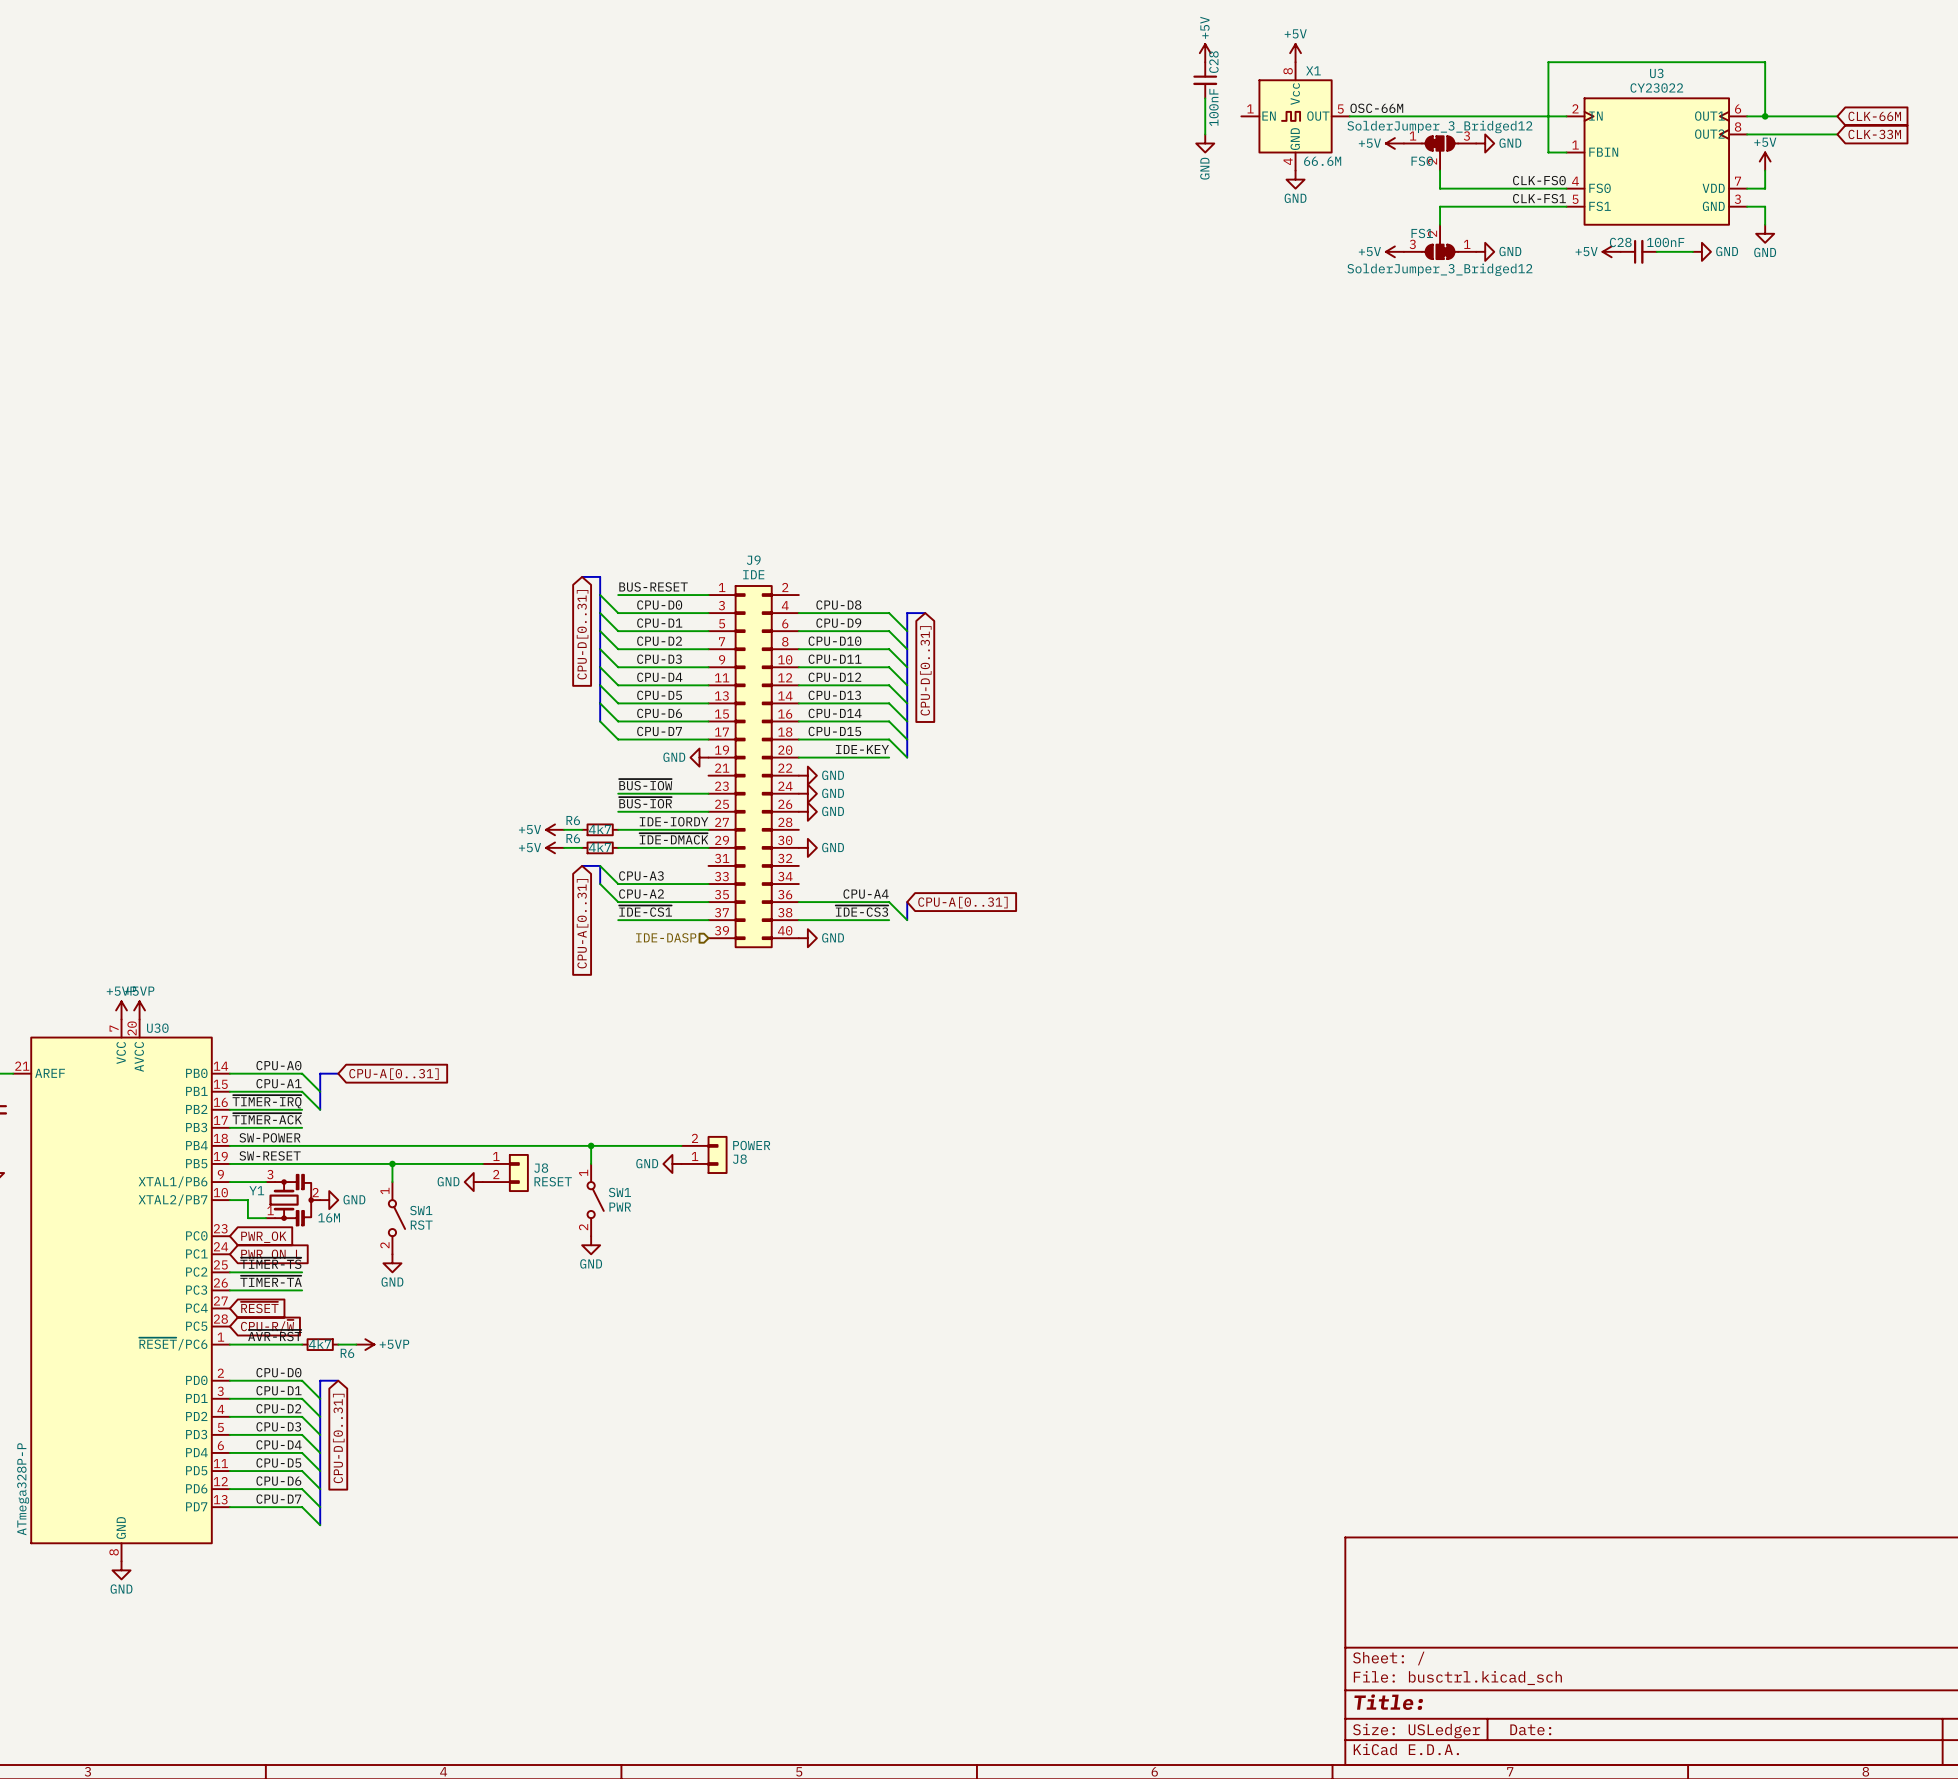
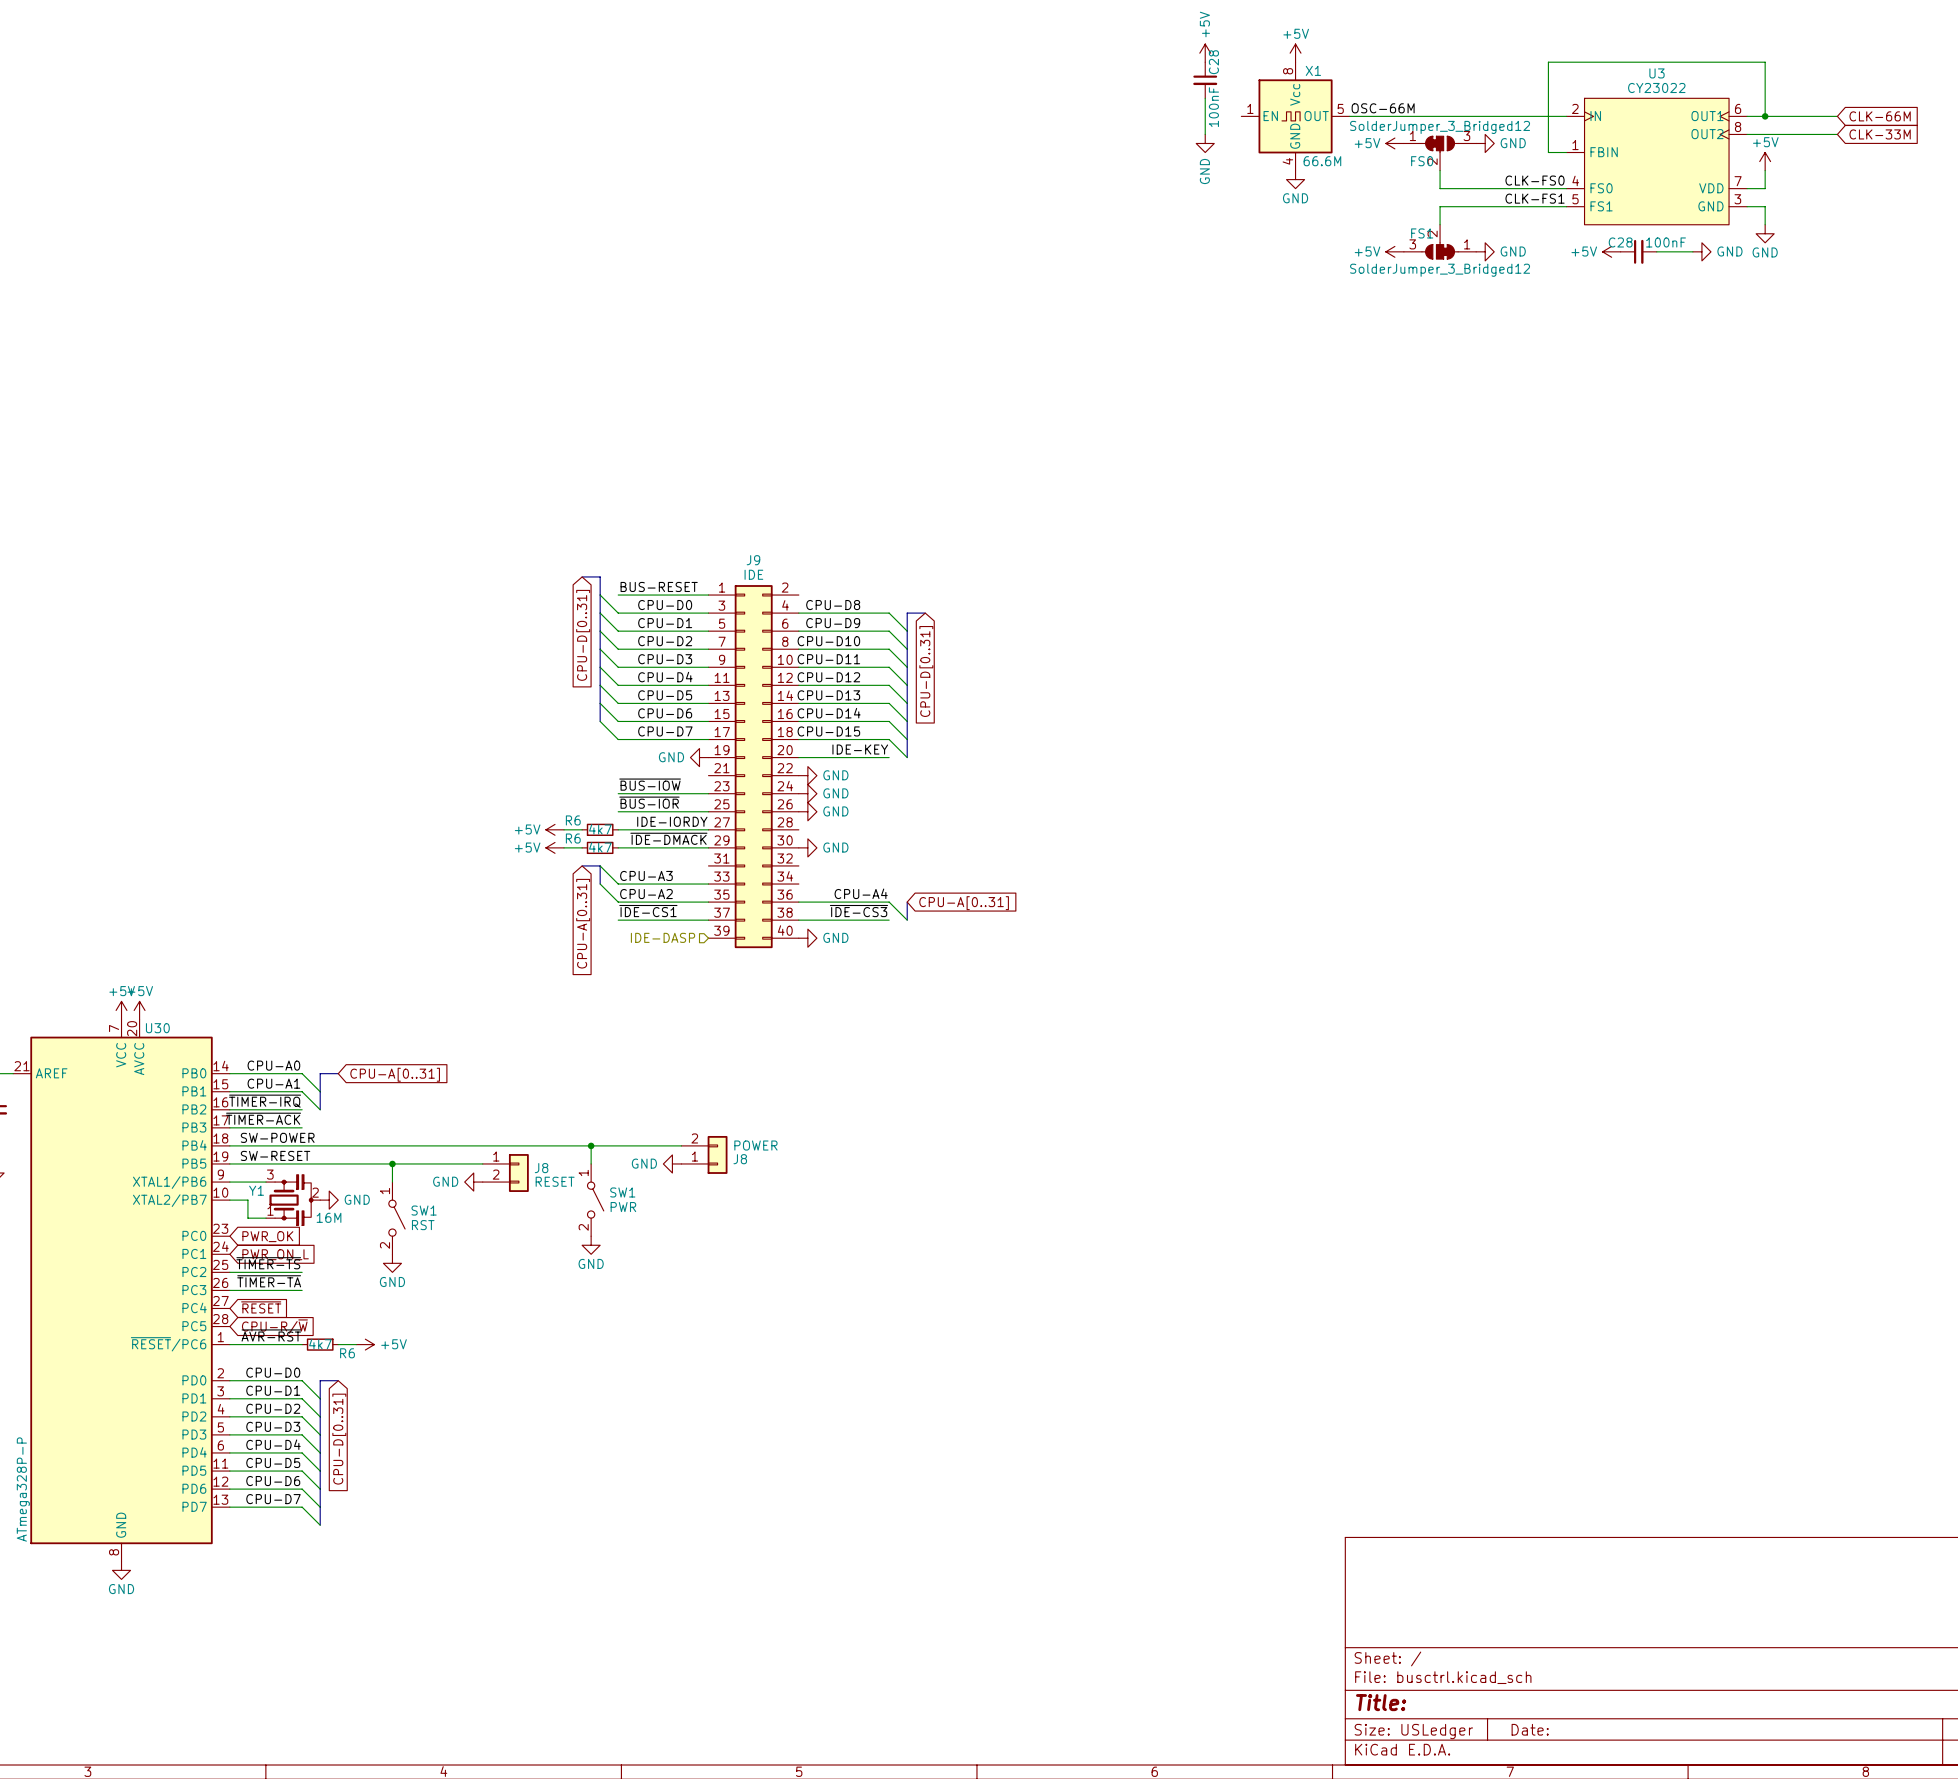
power symbol: +5VP (121, 1010) -> +5V (121, 1010)
power symbol: +5VP (139, 1010) -> +5V (139, 1010)
power symbol: +5VP (365, 1344) -> +5V (365, 1344)

